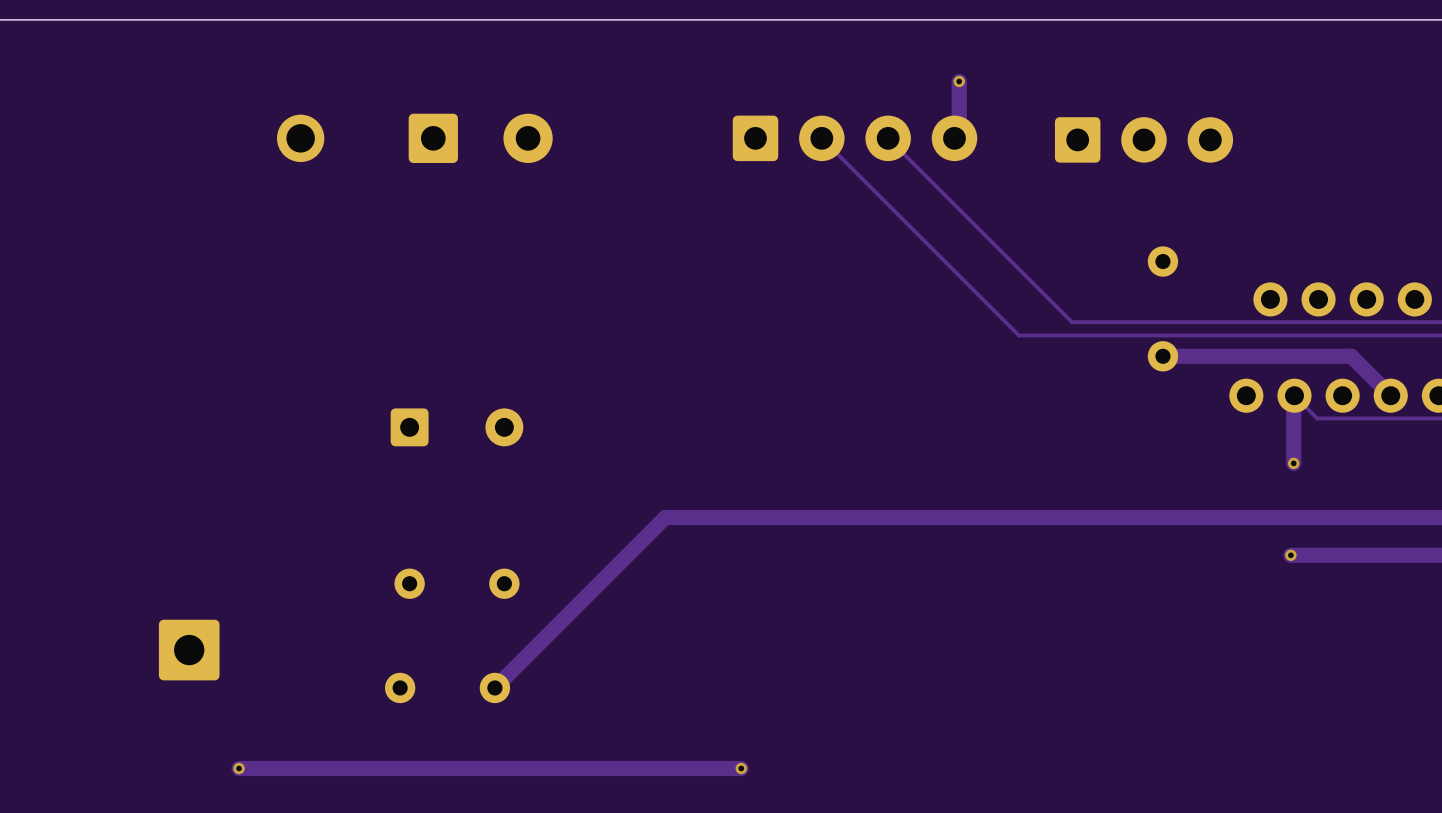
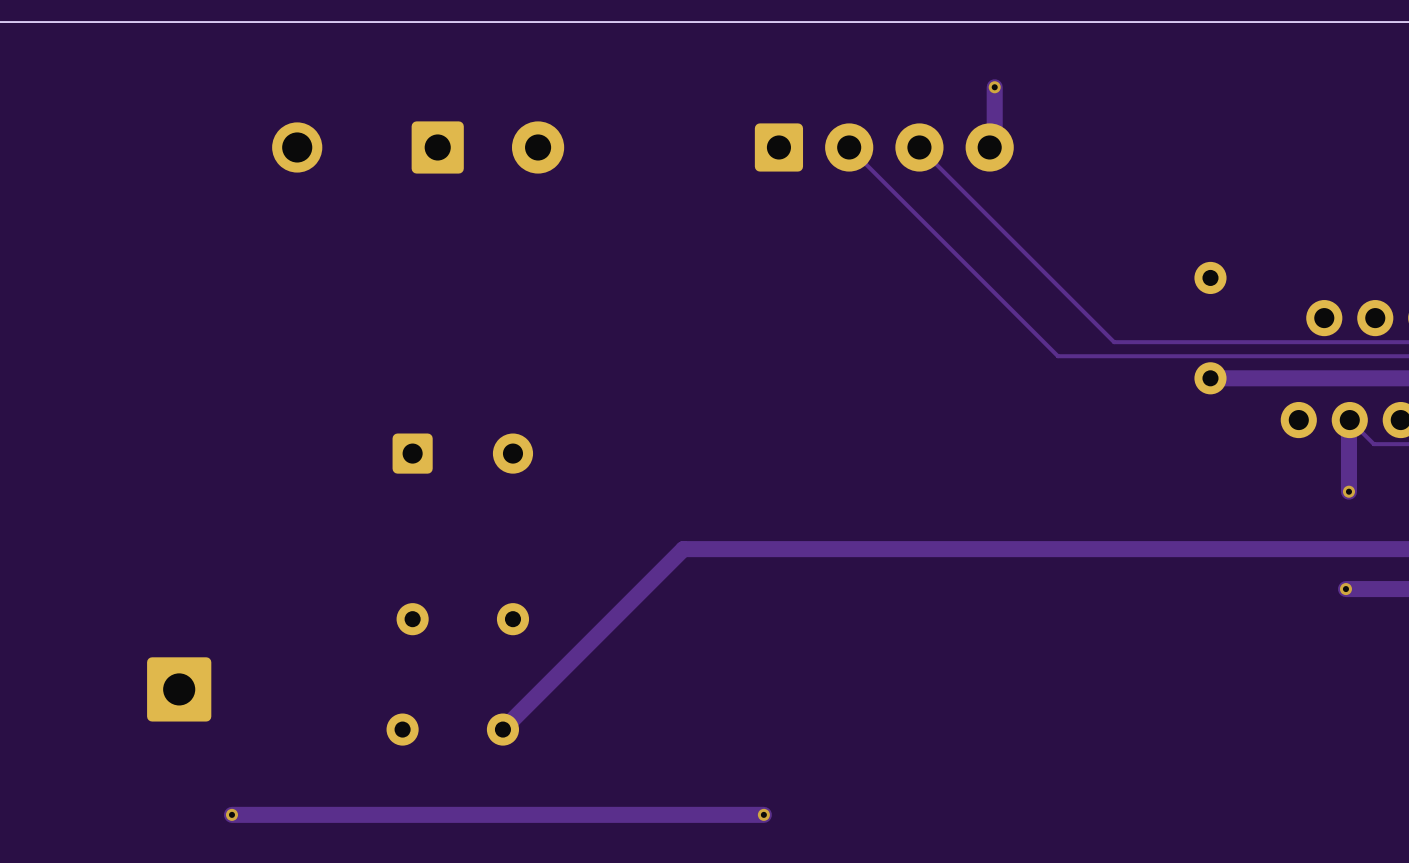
part: (1144, 139) -> none

